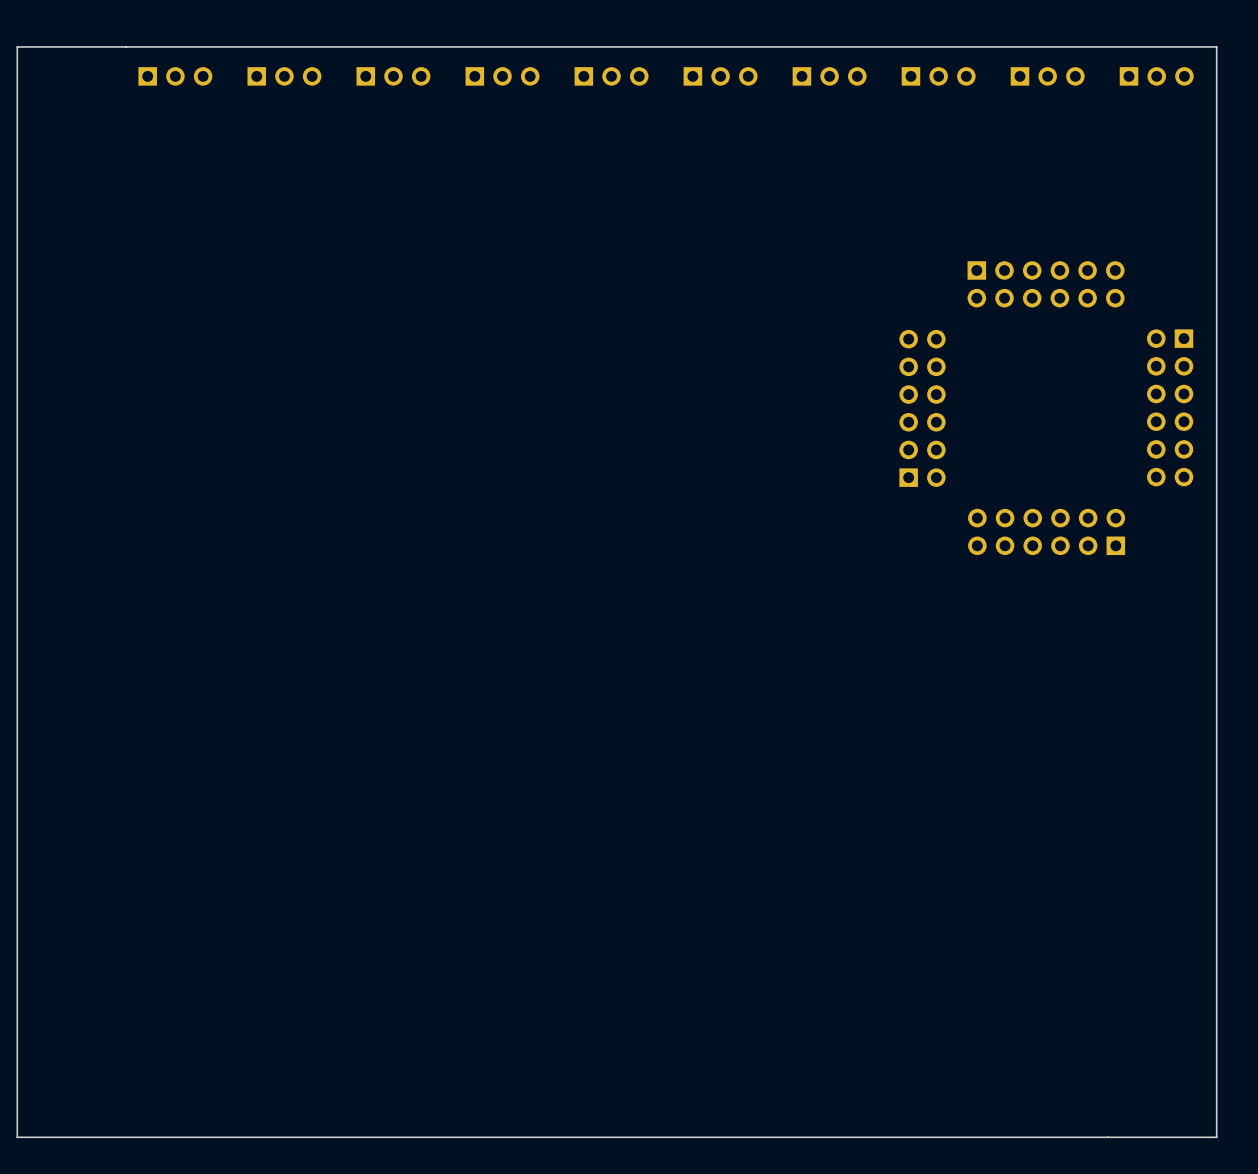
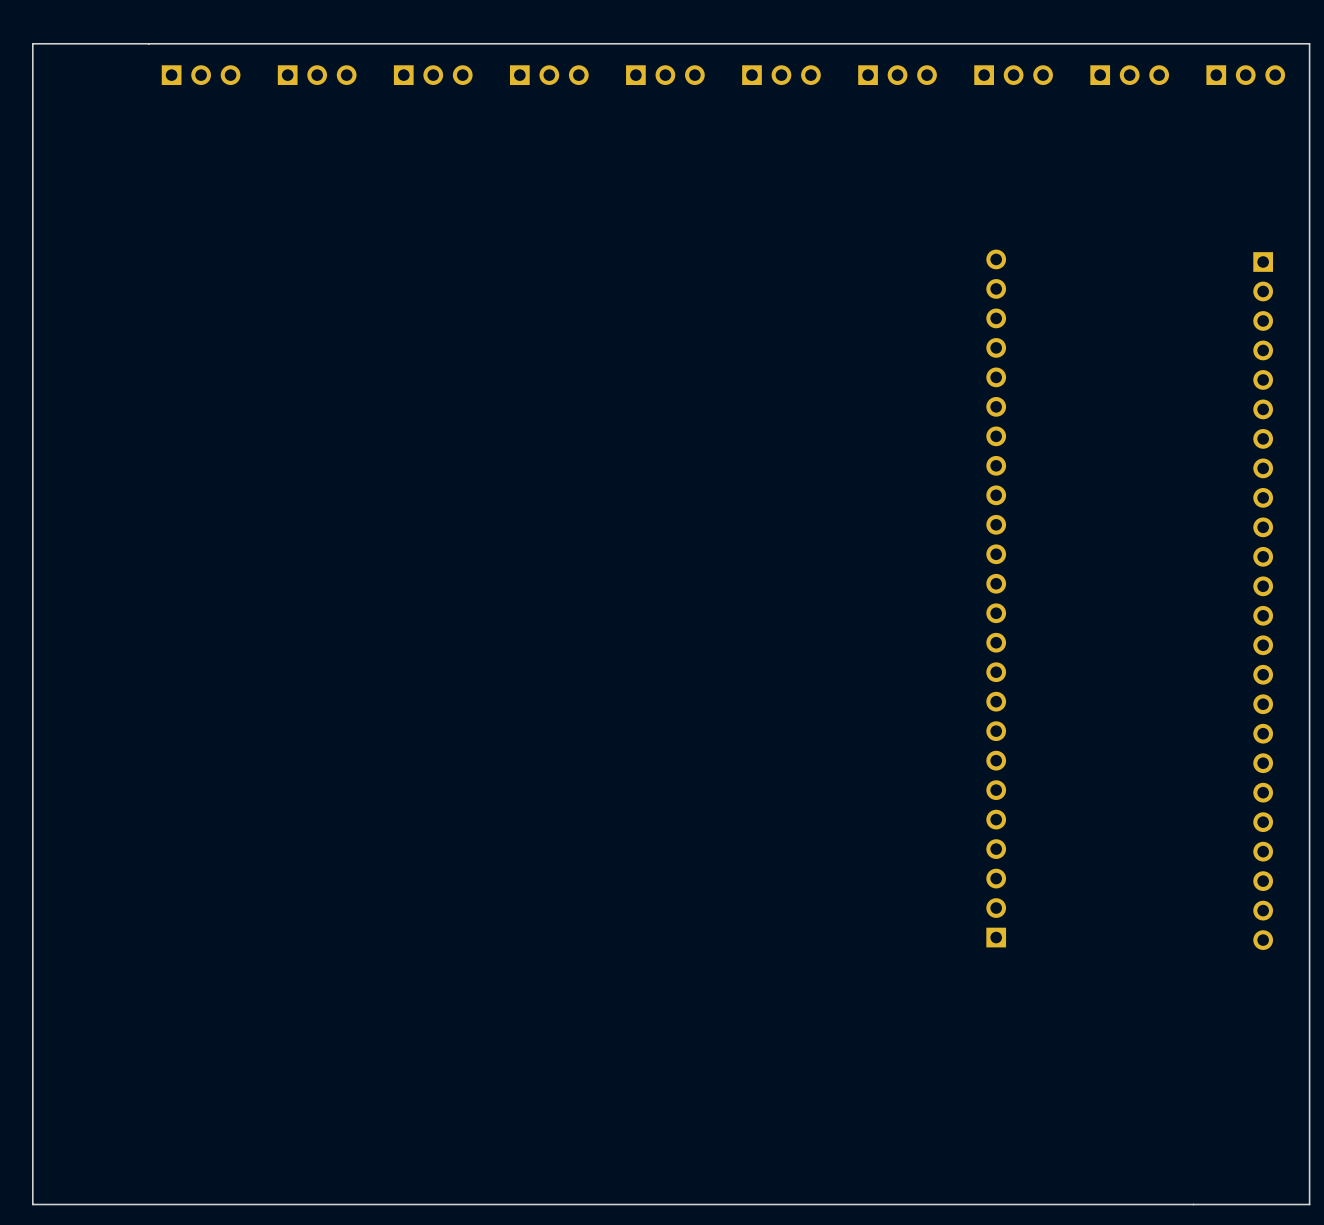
part: (1046, 284) -> none
part: (1170, 407) -> none
part: (922, 408) -> none
part: (1046, 531) -> none
part: none -> (996, 598)
part: none -> (1263, 601)

